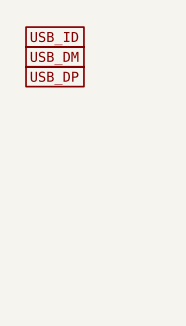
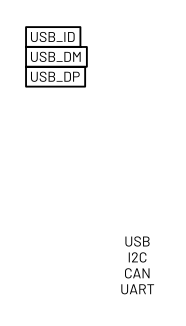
text: none -> USB (137, 241)
text: none -> I2C (137, 257)
text: none -> CAN (137, 273)
text: none -> UART (137, 289)

